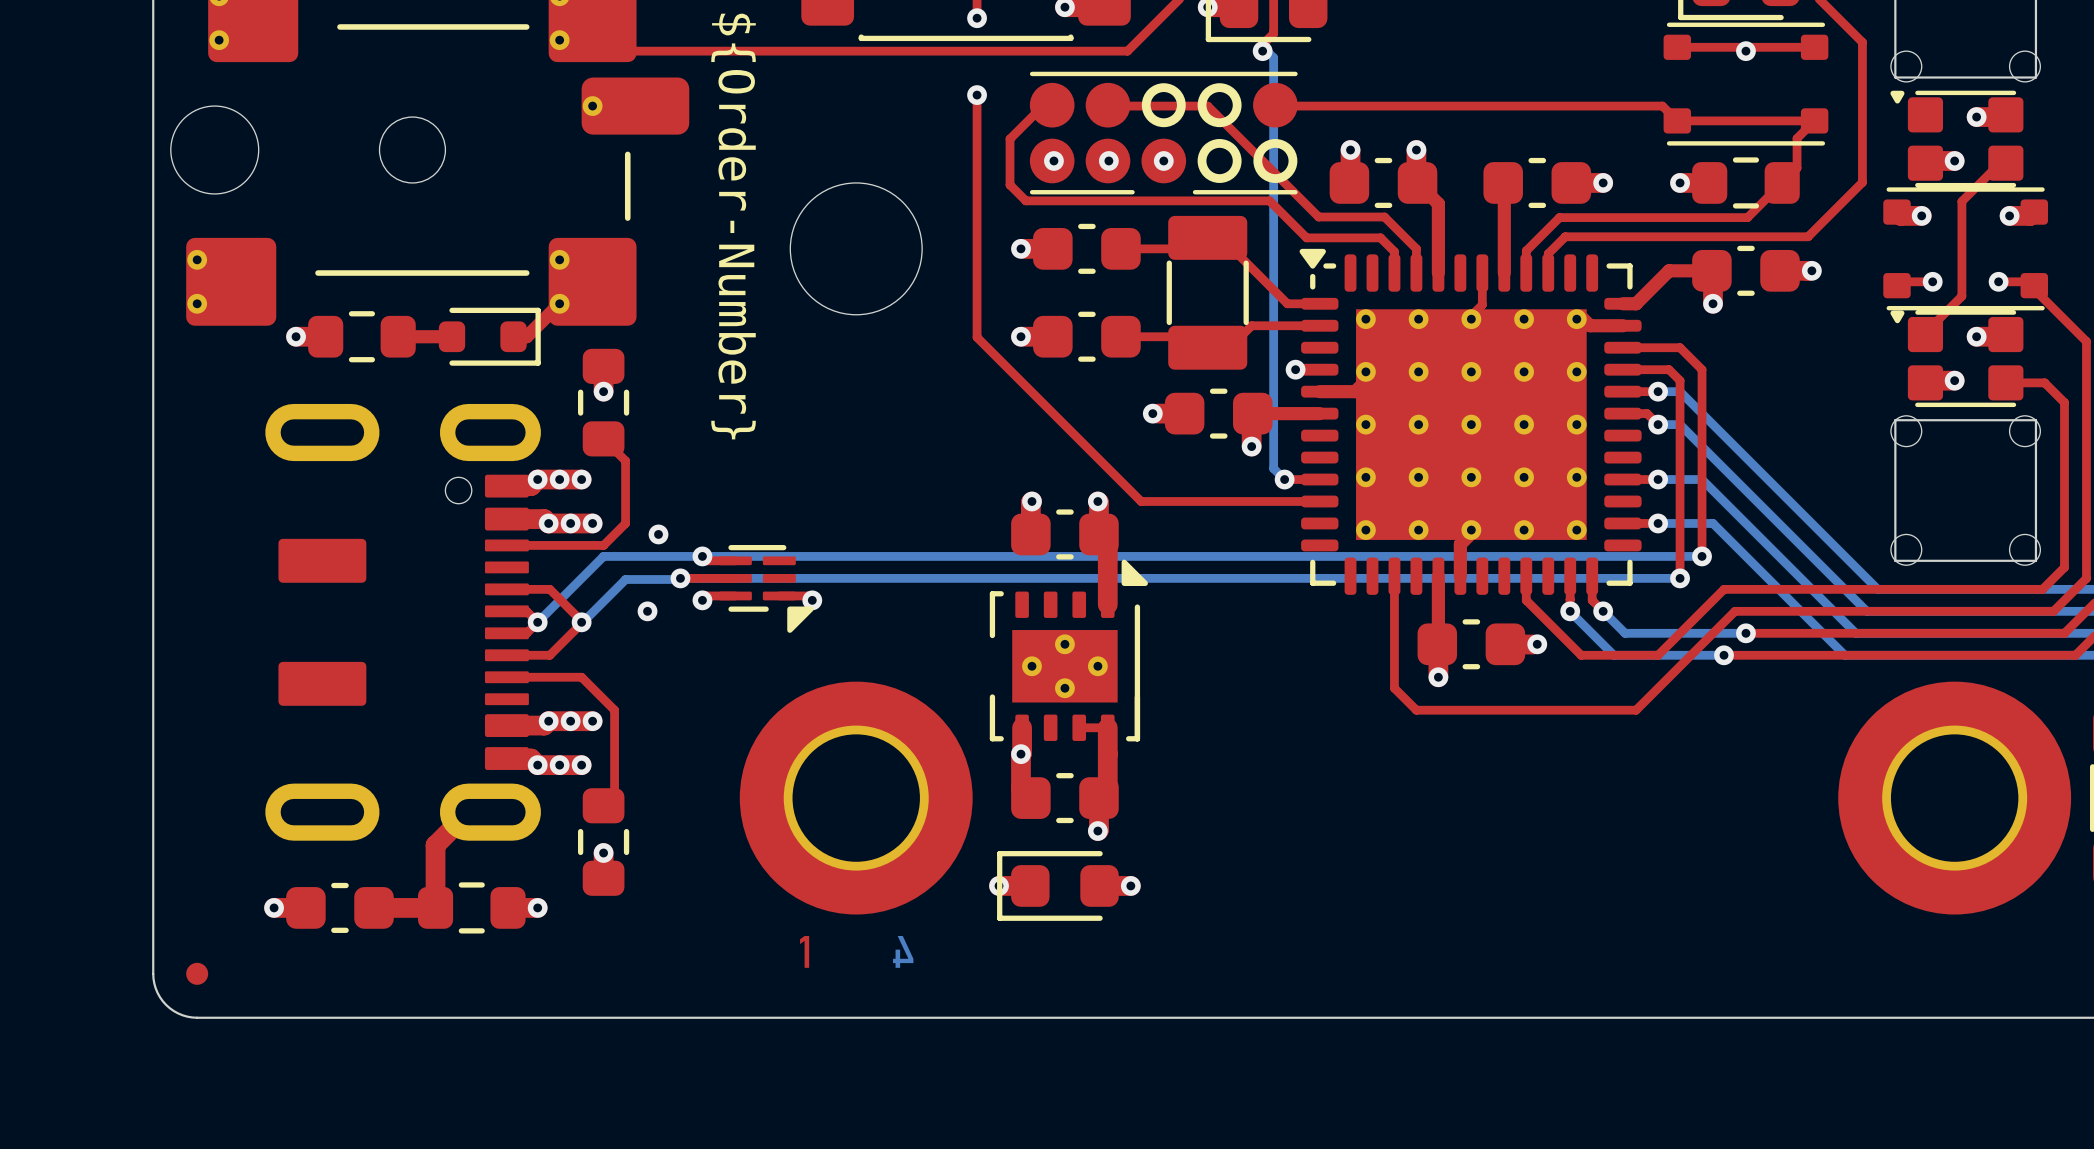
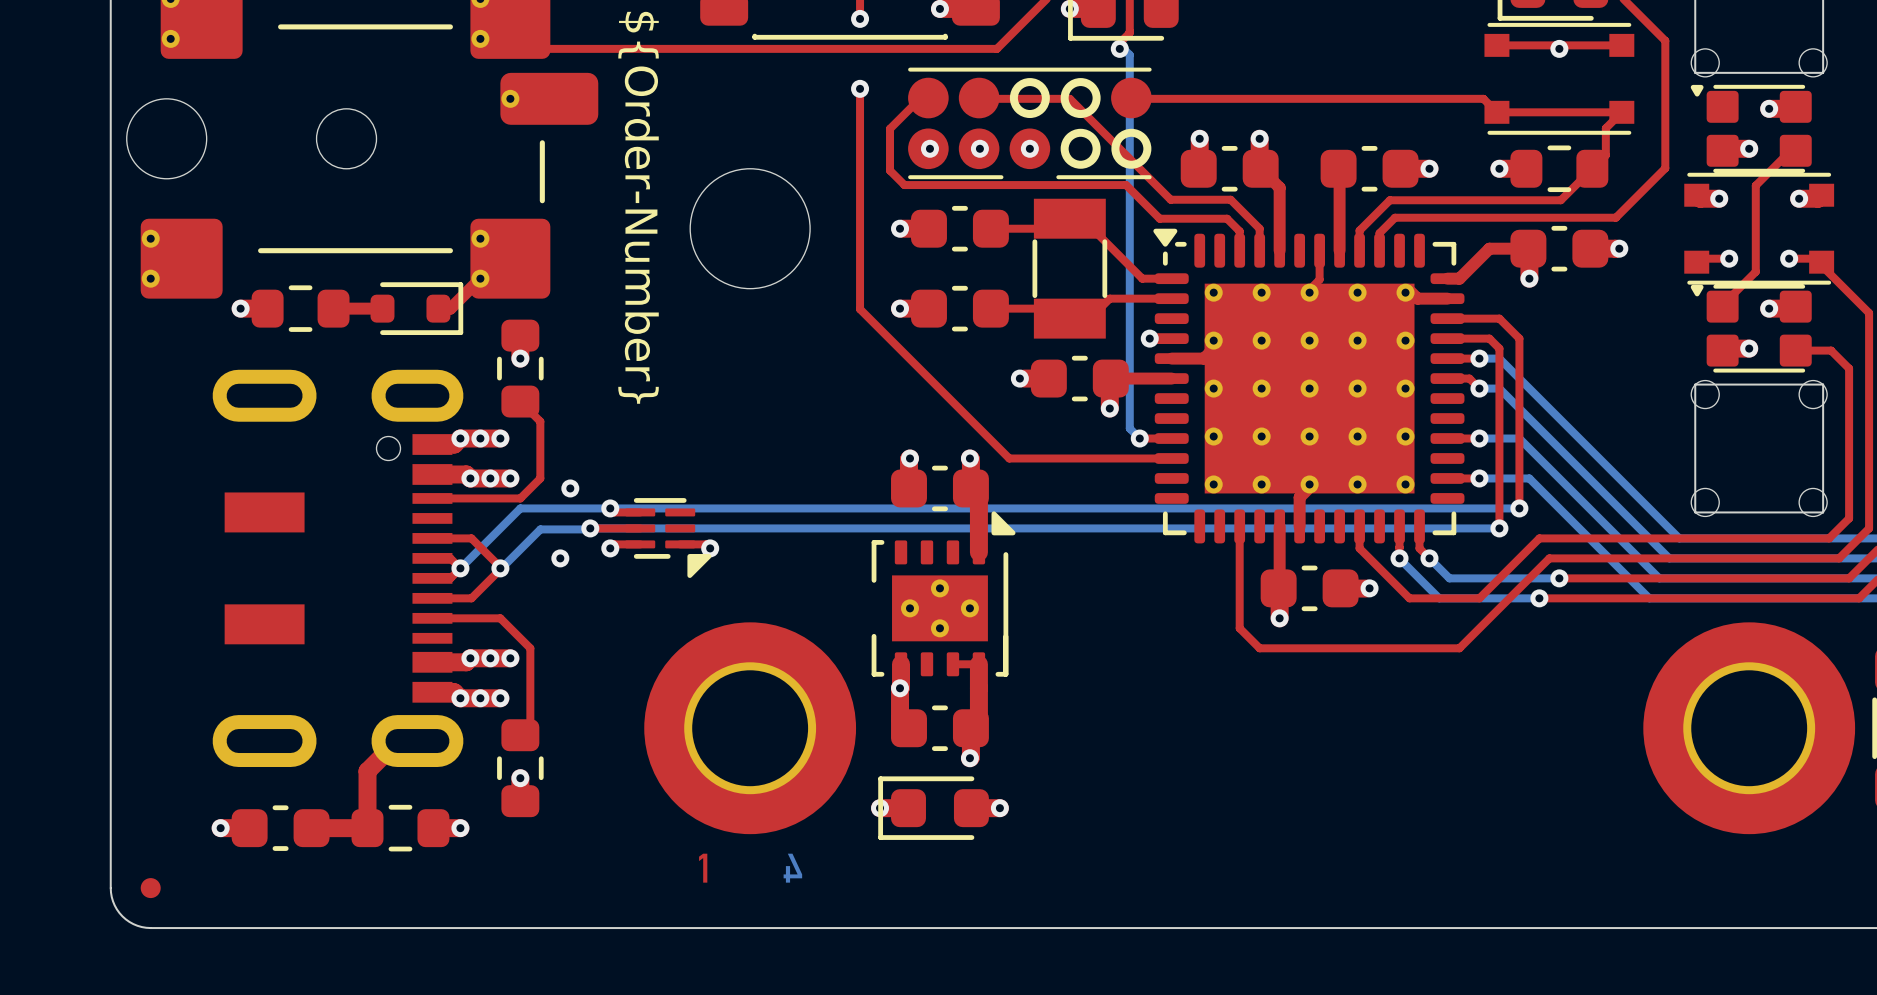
part footprint: [1663, 22, 1829, 146] -> [1484, 22, 1635, 135]
part footprint: [1883, 187, 2049, 311] -> [1684, 172, 1835, 285]
part footprint: [1166, 215, 1249, 370] -> [1032, 198, 1108, 339]
part footprint: [265, 403, 541, 841] -> [212, 369, 464, 768]

